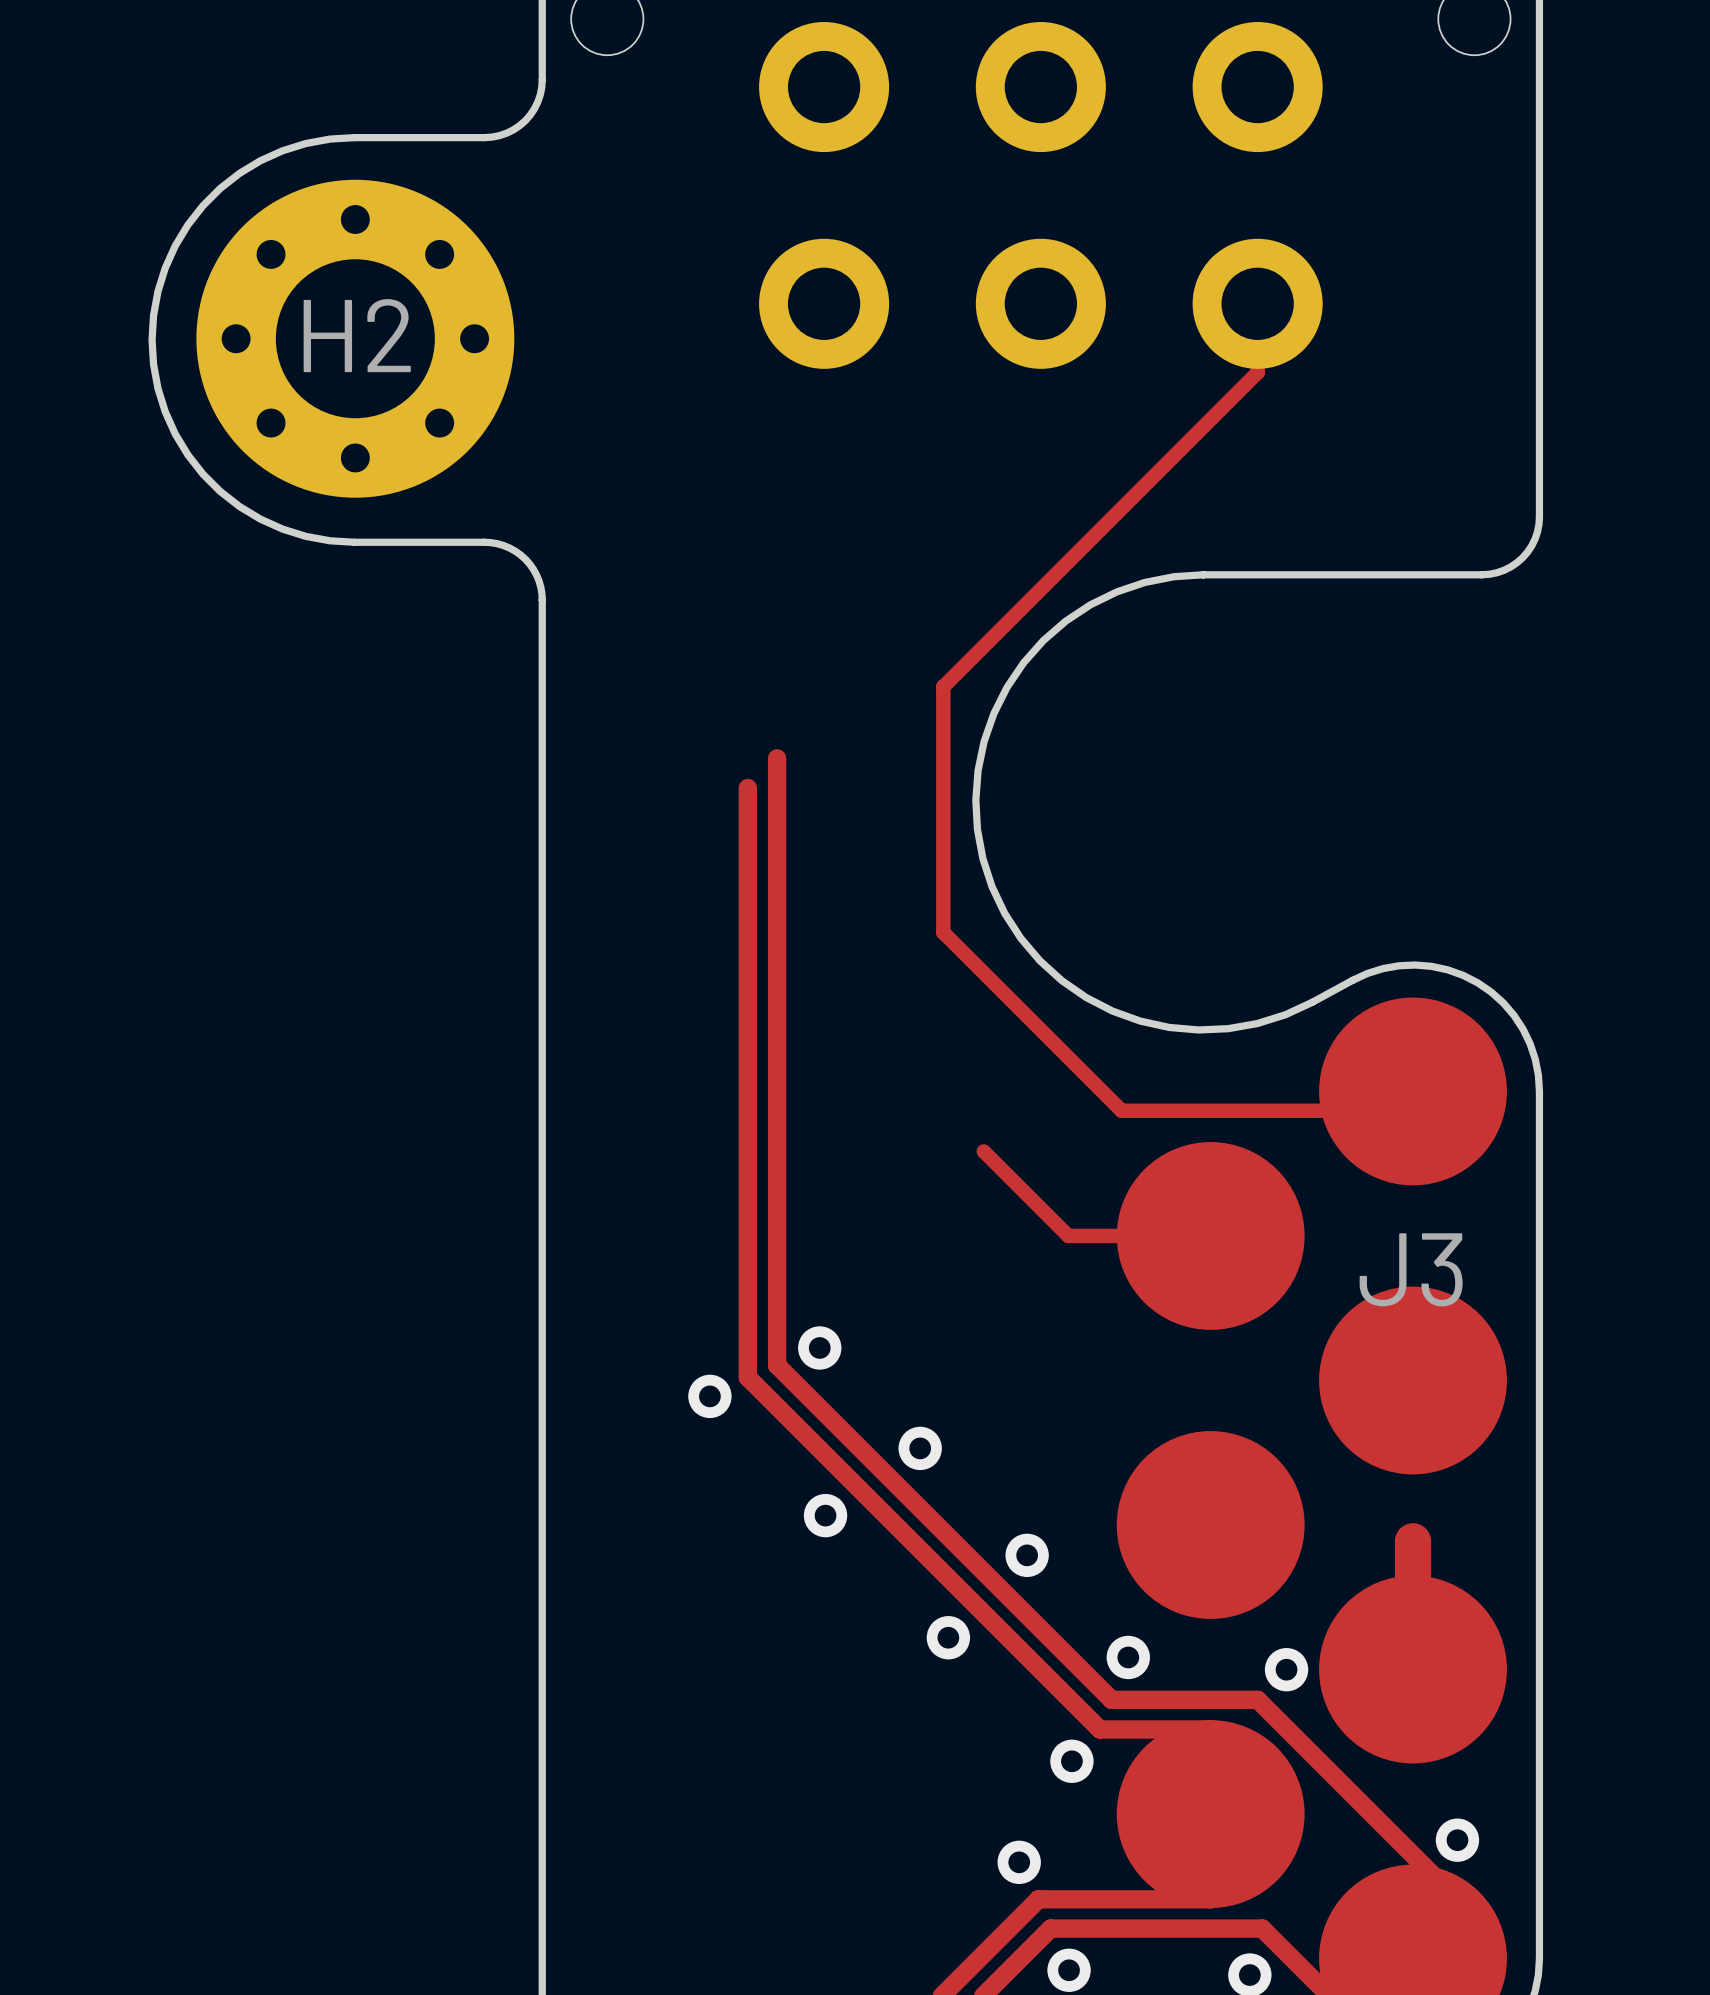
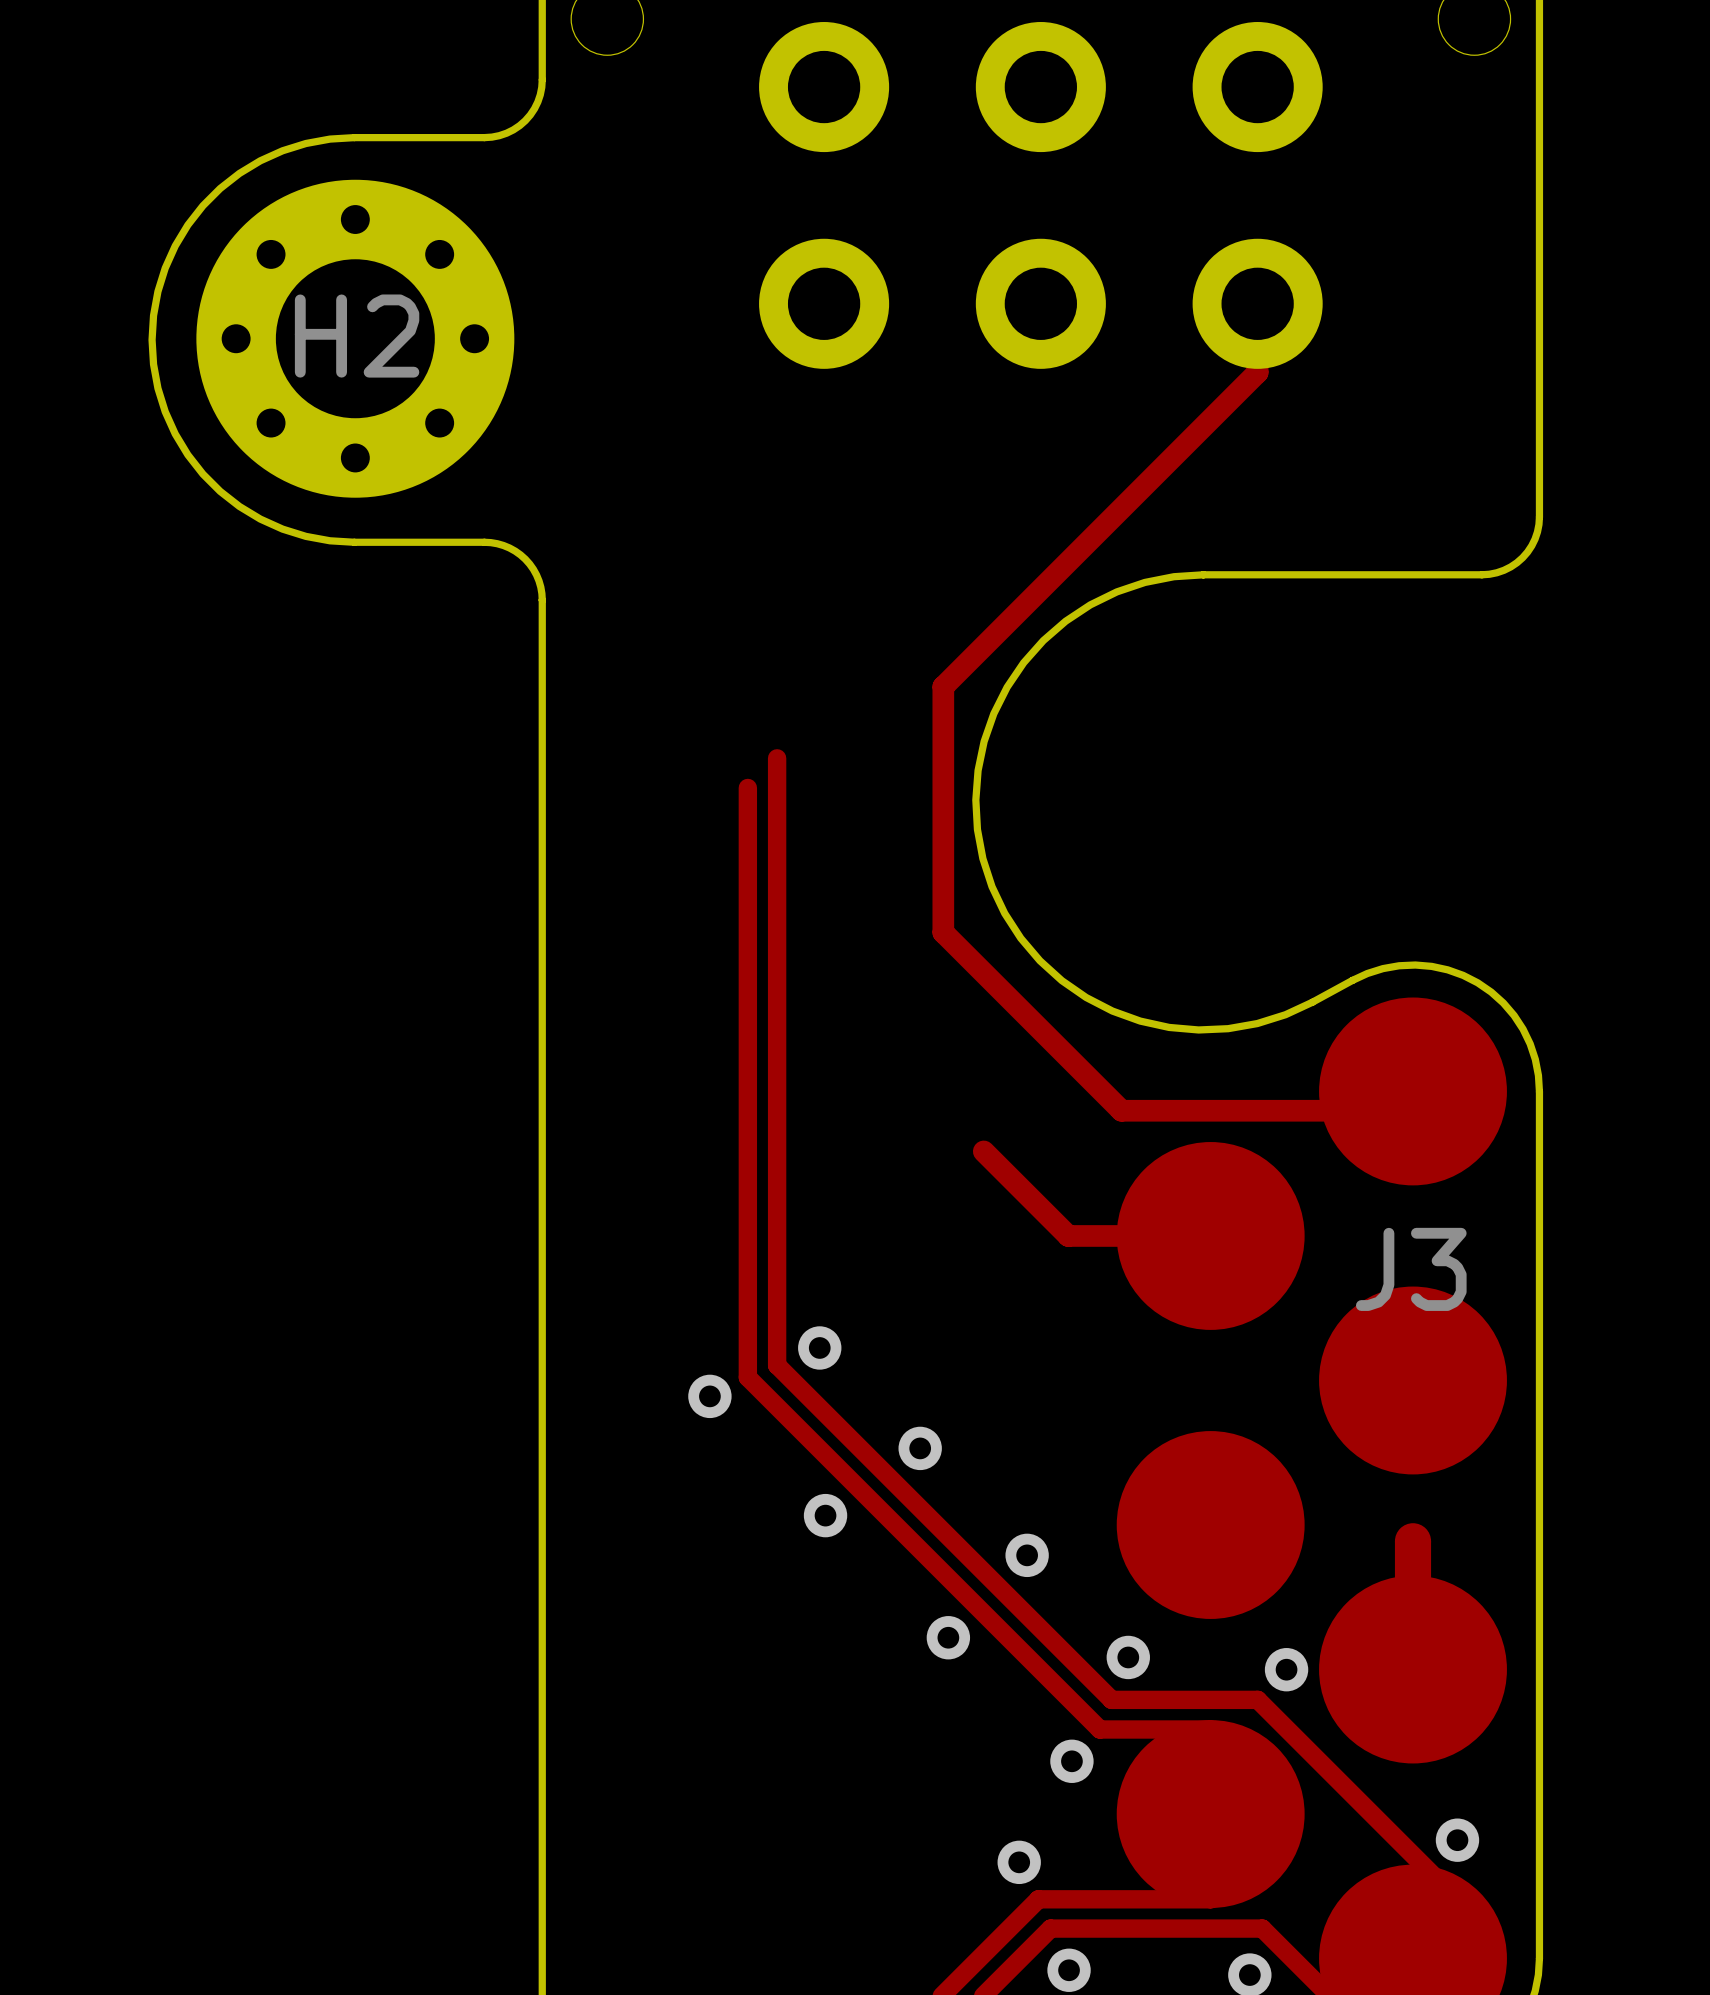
top track width: thin (1257, 303) (1257, 372) (943, 686) (943, 932) (1121, 1110) (1349, 1110) -> thick (1257, 303) (1257, 372) (943, 686) (943, 932) (1121, 1110) (1349, 1110)
top track width: thin (983, 1151) (1068, 1235) (1210, 1235) -> thick (983, 1151) (1068, 1235) (1210, 1235)

